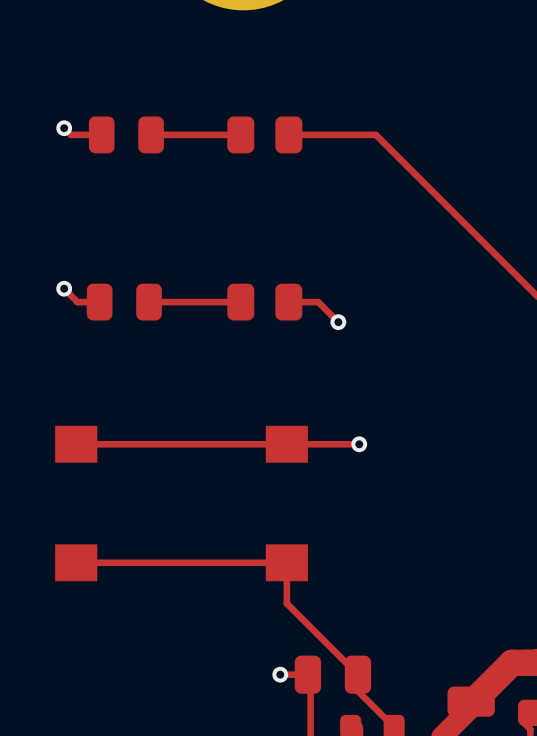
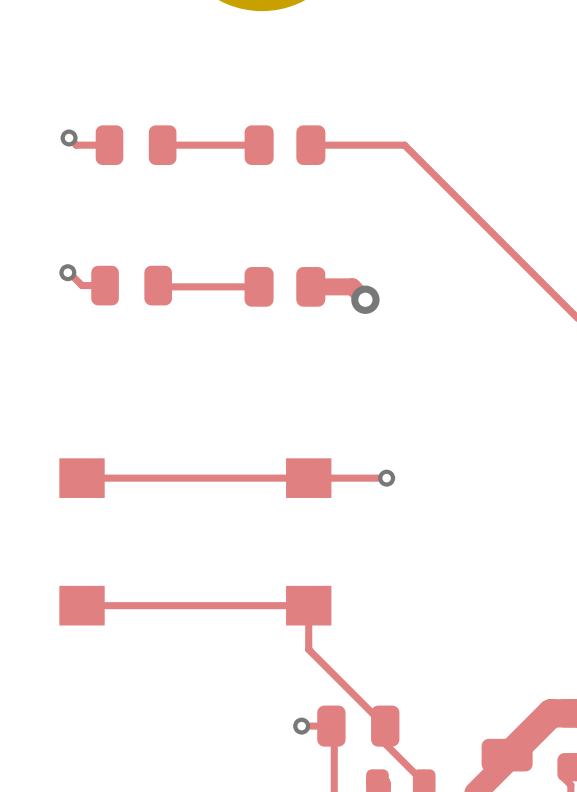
top track: none -> (67, 271) (82, 285) (105, 285)
top track: none -> (158, 285) (259, 286)
top track: none -> (310, 286) (352, 286) (365, 299)
via: none -> (365, 299)
top track: (64, 288) (77, 302) (99, 302) -> none
via position: (64, 288) -> (67, 272)
part position: (124, 302) -> (131, 285)
top track: (240, 302) (149, 302) -> none
part position: (264, 302) -> (284, 286)
top track: (288, 302) (318, 302) (338, 322) -> none
via: (338, 322) -> none

